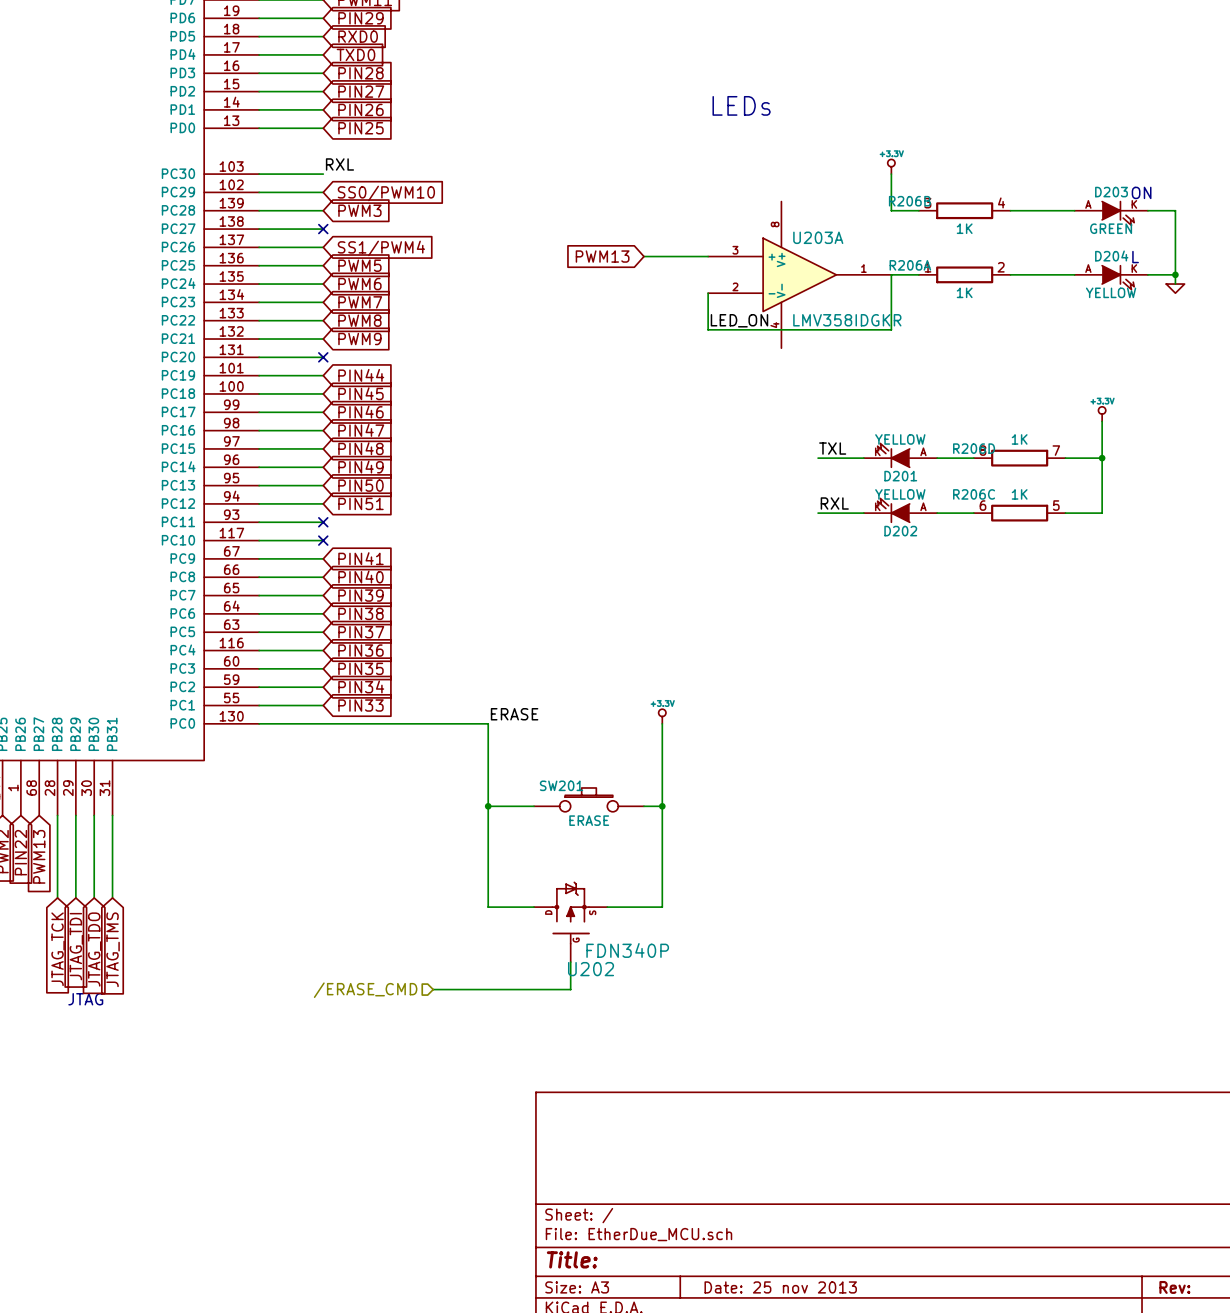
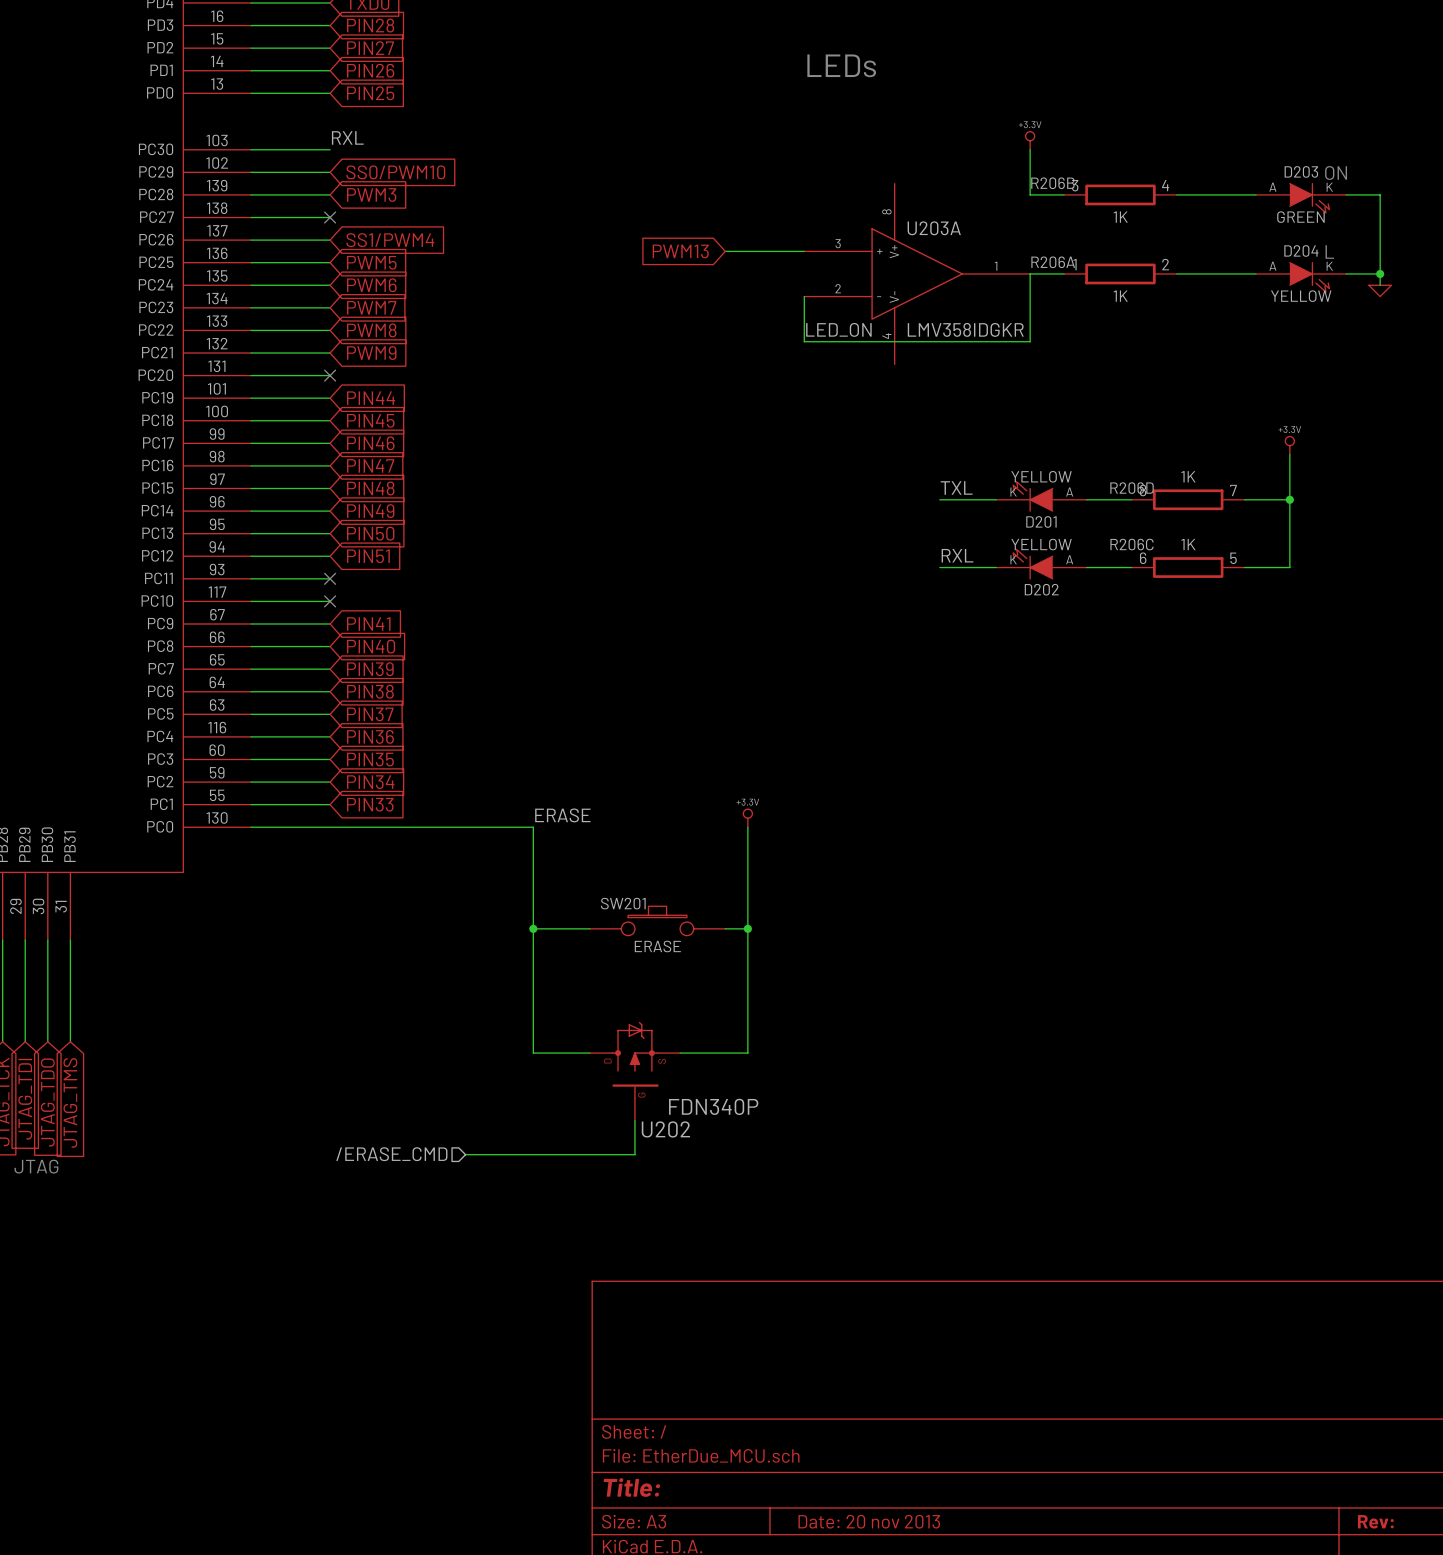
title block: Date: 25 nov 2013 (780, 1287) -> Date: 20 nov 2013 (869, 1521)

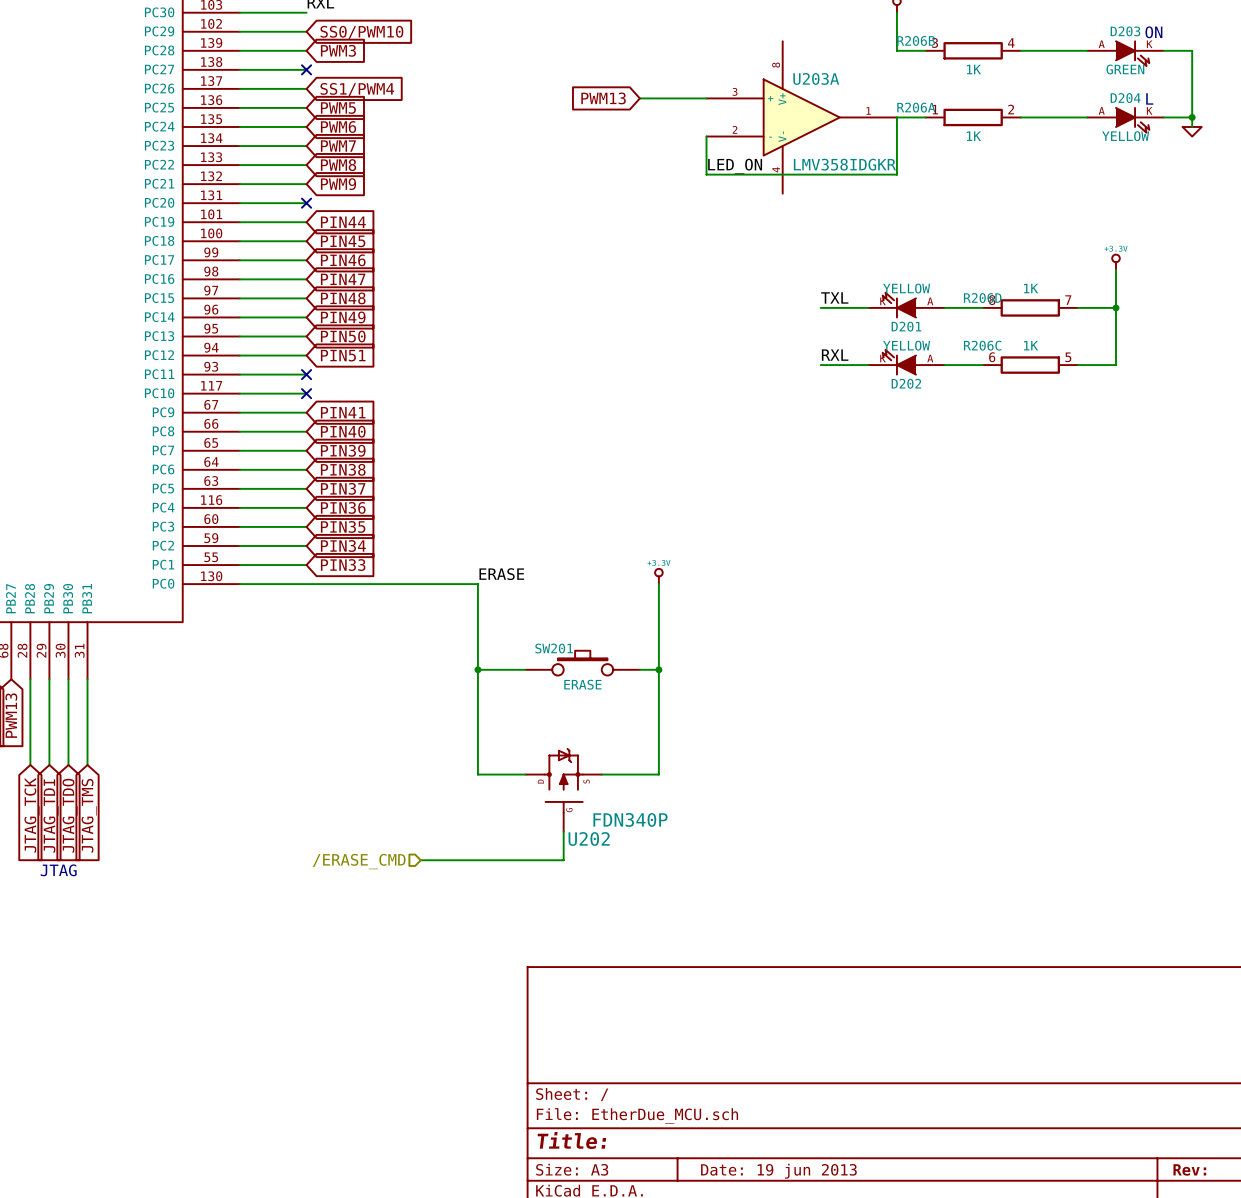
title block: Date: 20 nov 2013 (869, 1521) -> Date: 19 jun 2013 (778, 1171)

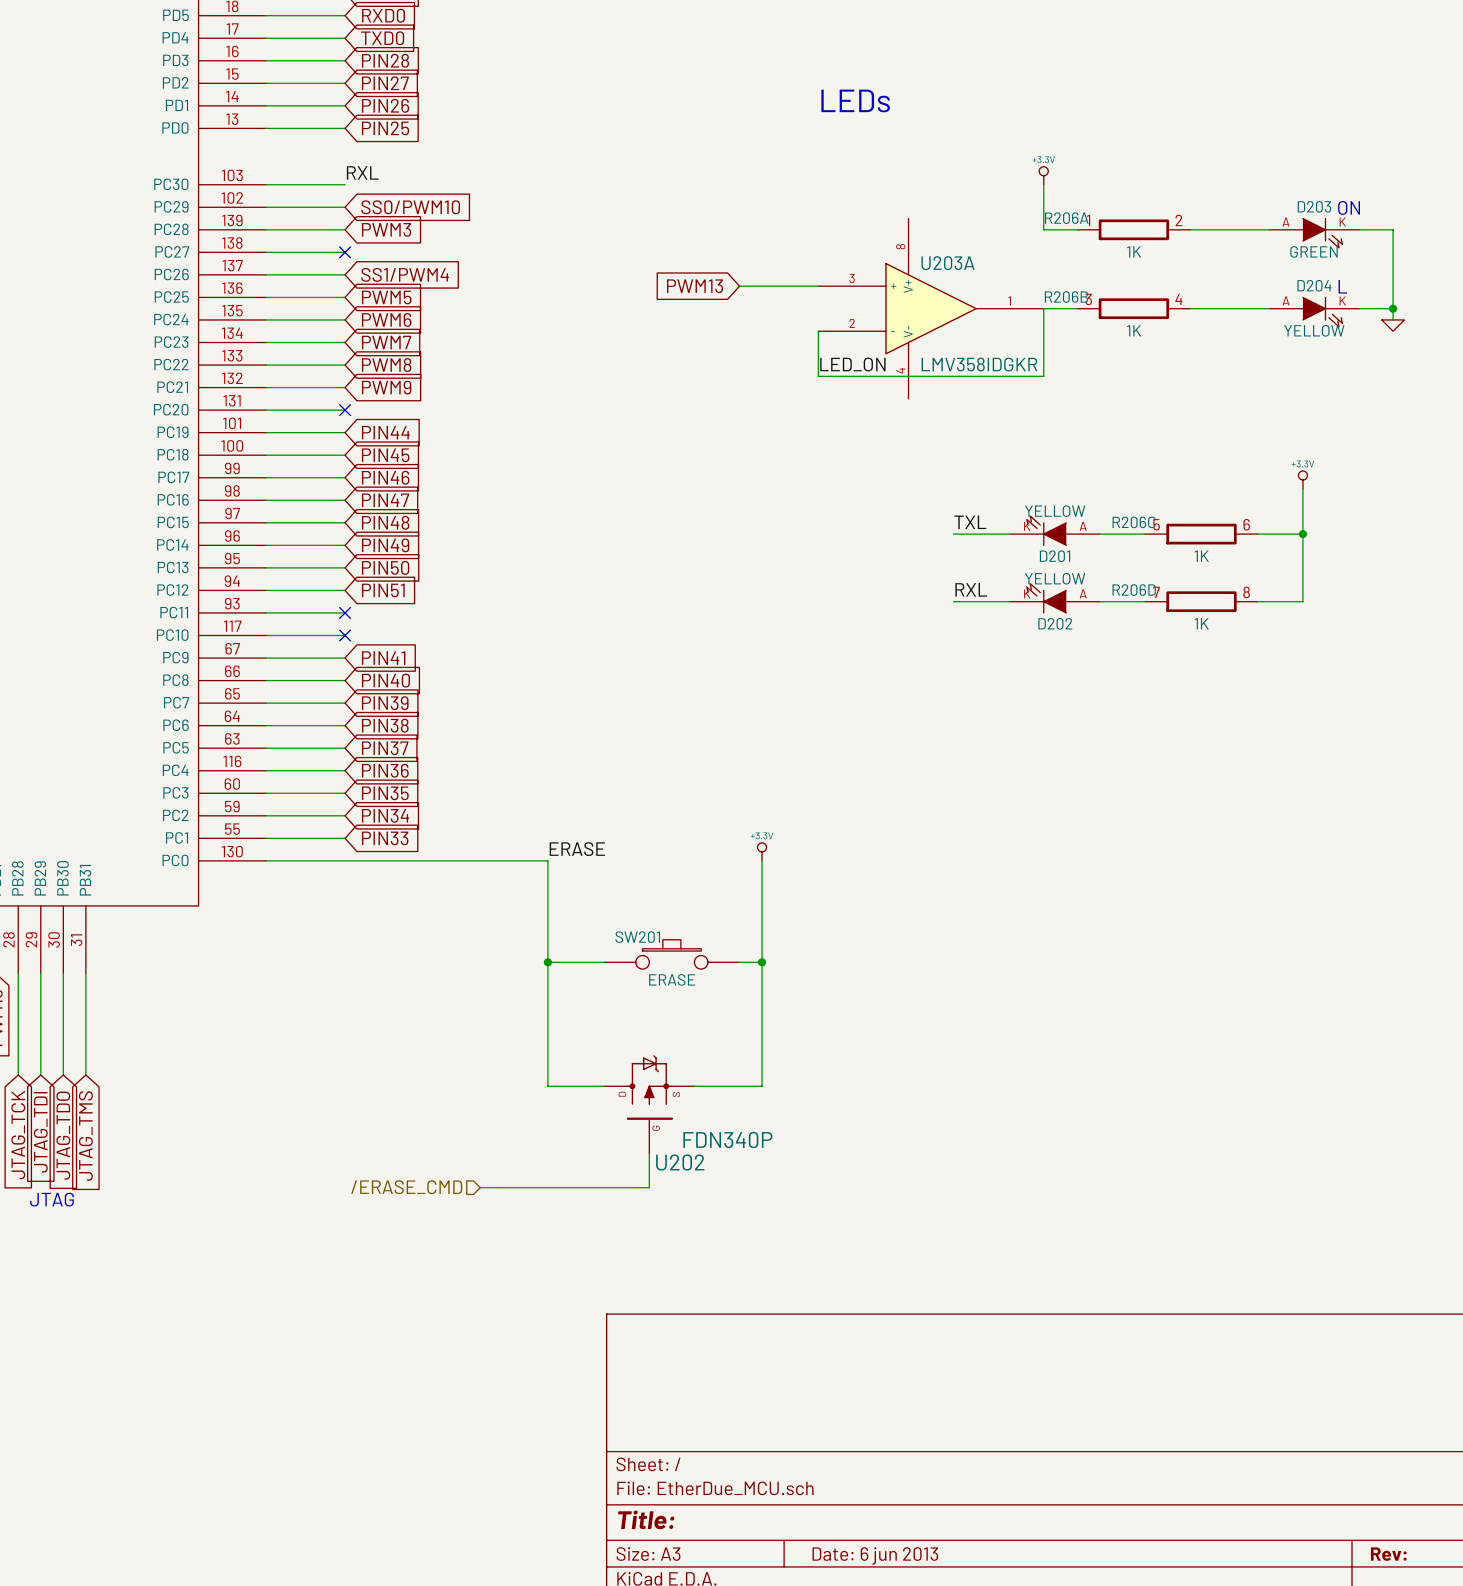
R206B position: (973, 50) -> (1133, 308)
R206A position: (973, 117) -> (1133, 229)
R206D rotation: 0° (1030, 307) -> 180° (1201, 601)
R206C rotation: 0° (1030, 365) -> 180° (1201, 534)
title block: Date: 19 jun 2013 (778, 1171) -> Date: 6 jun 2013 (875, 1555)

